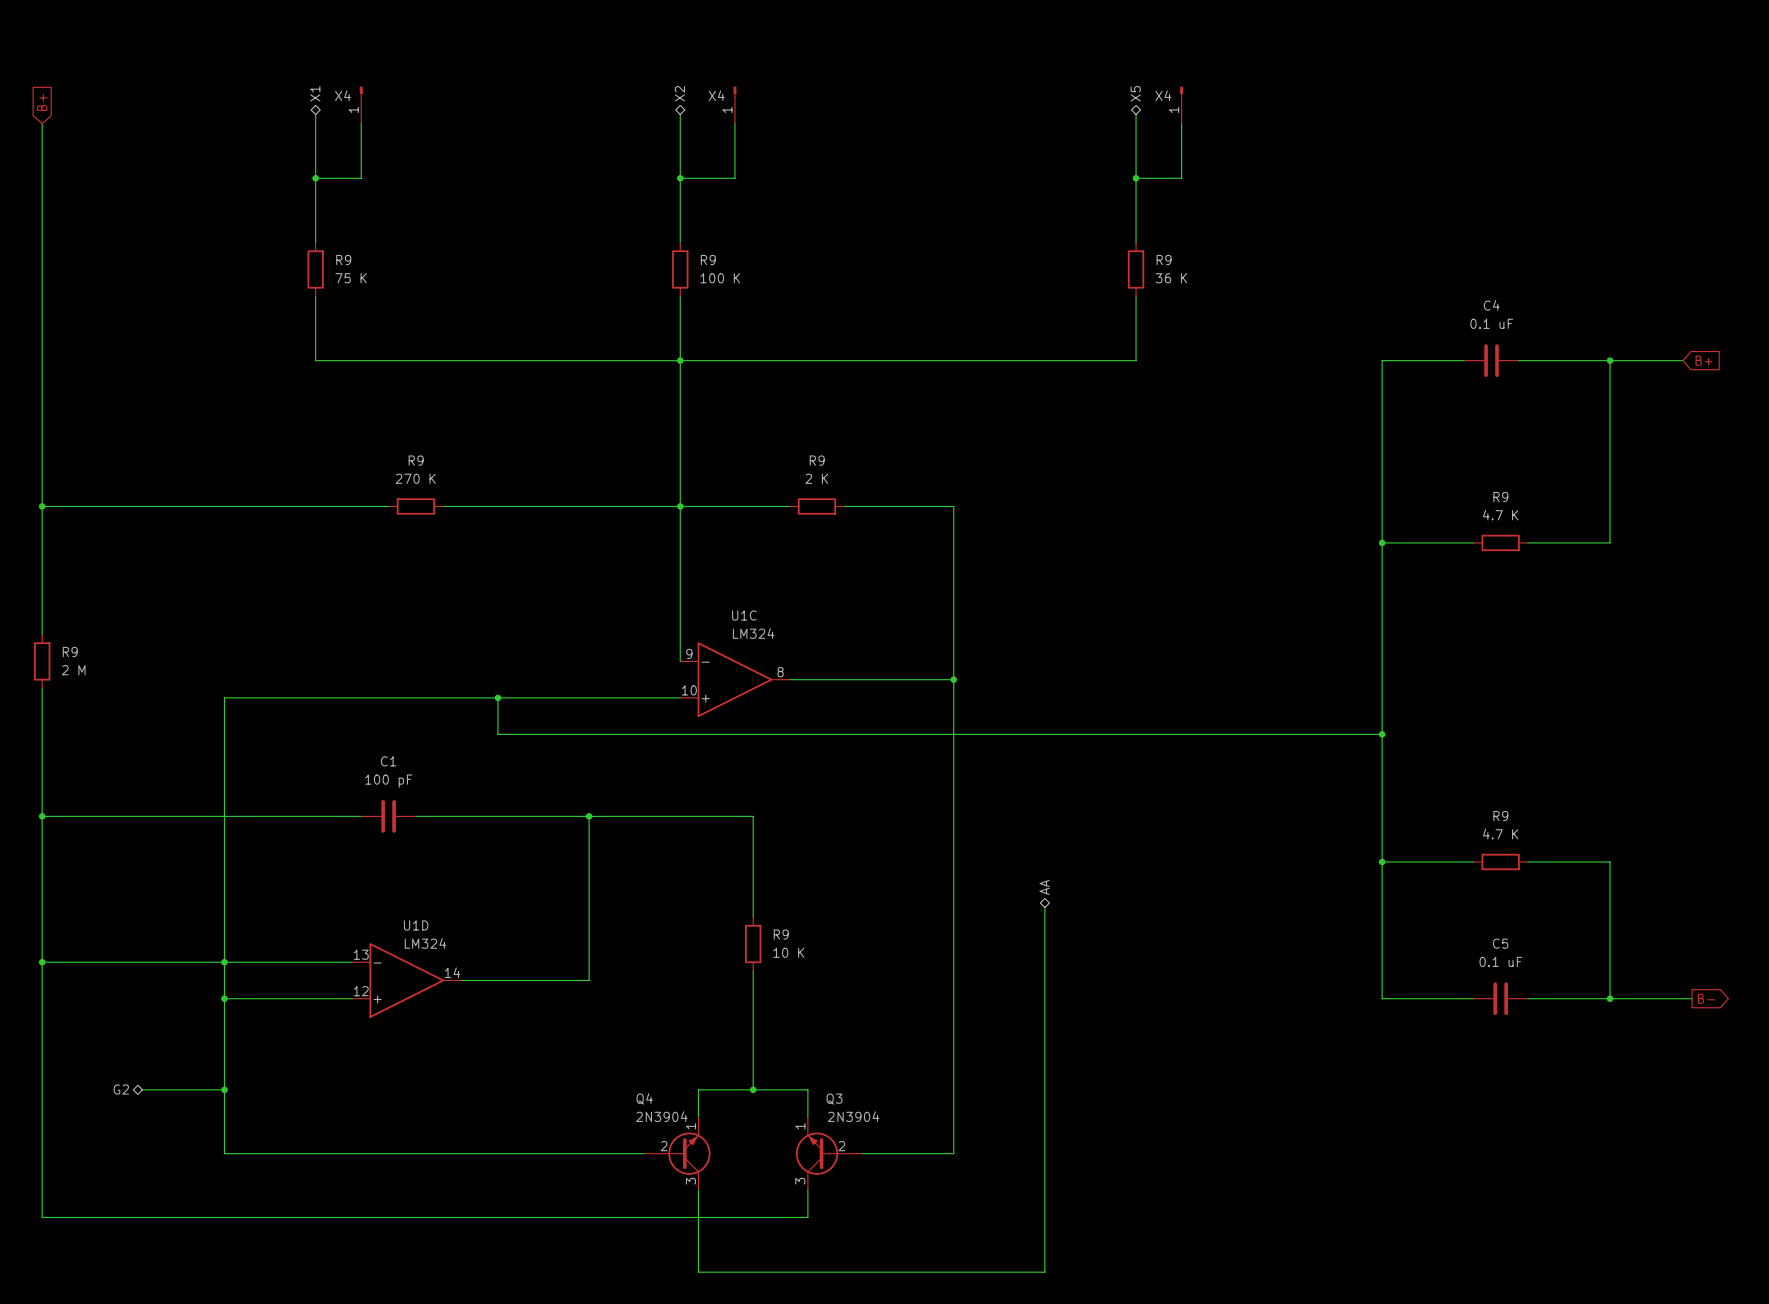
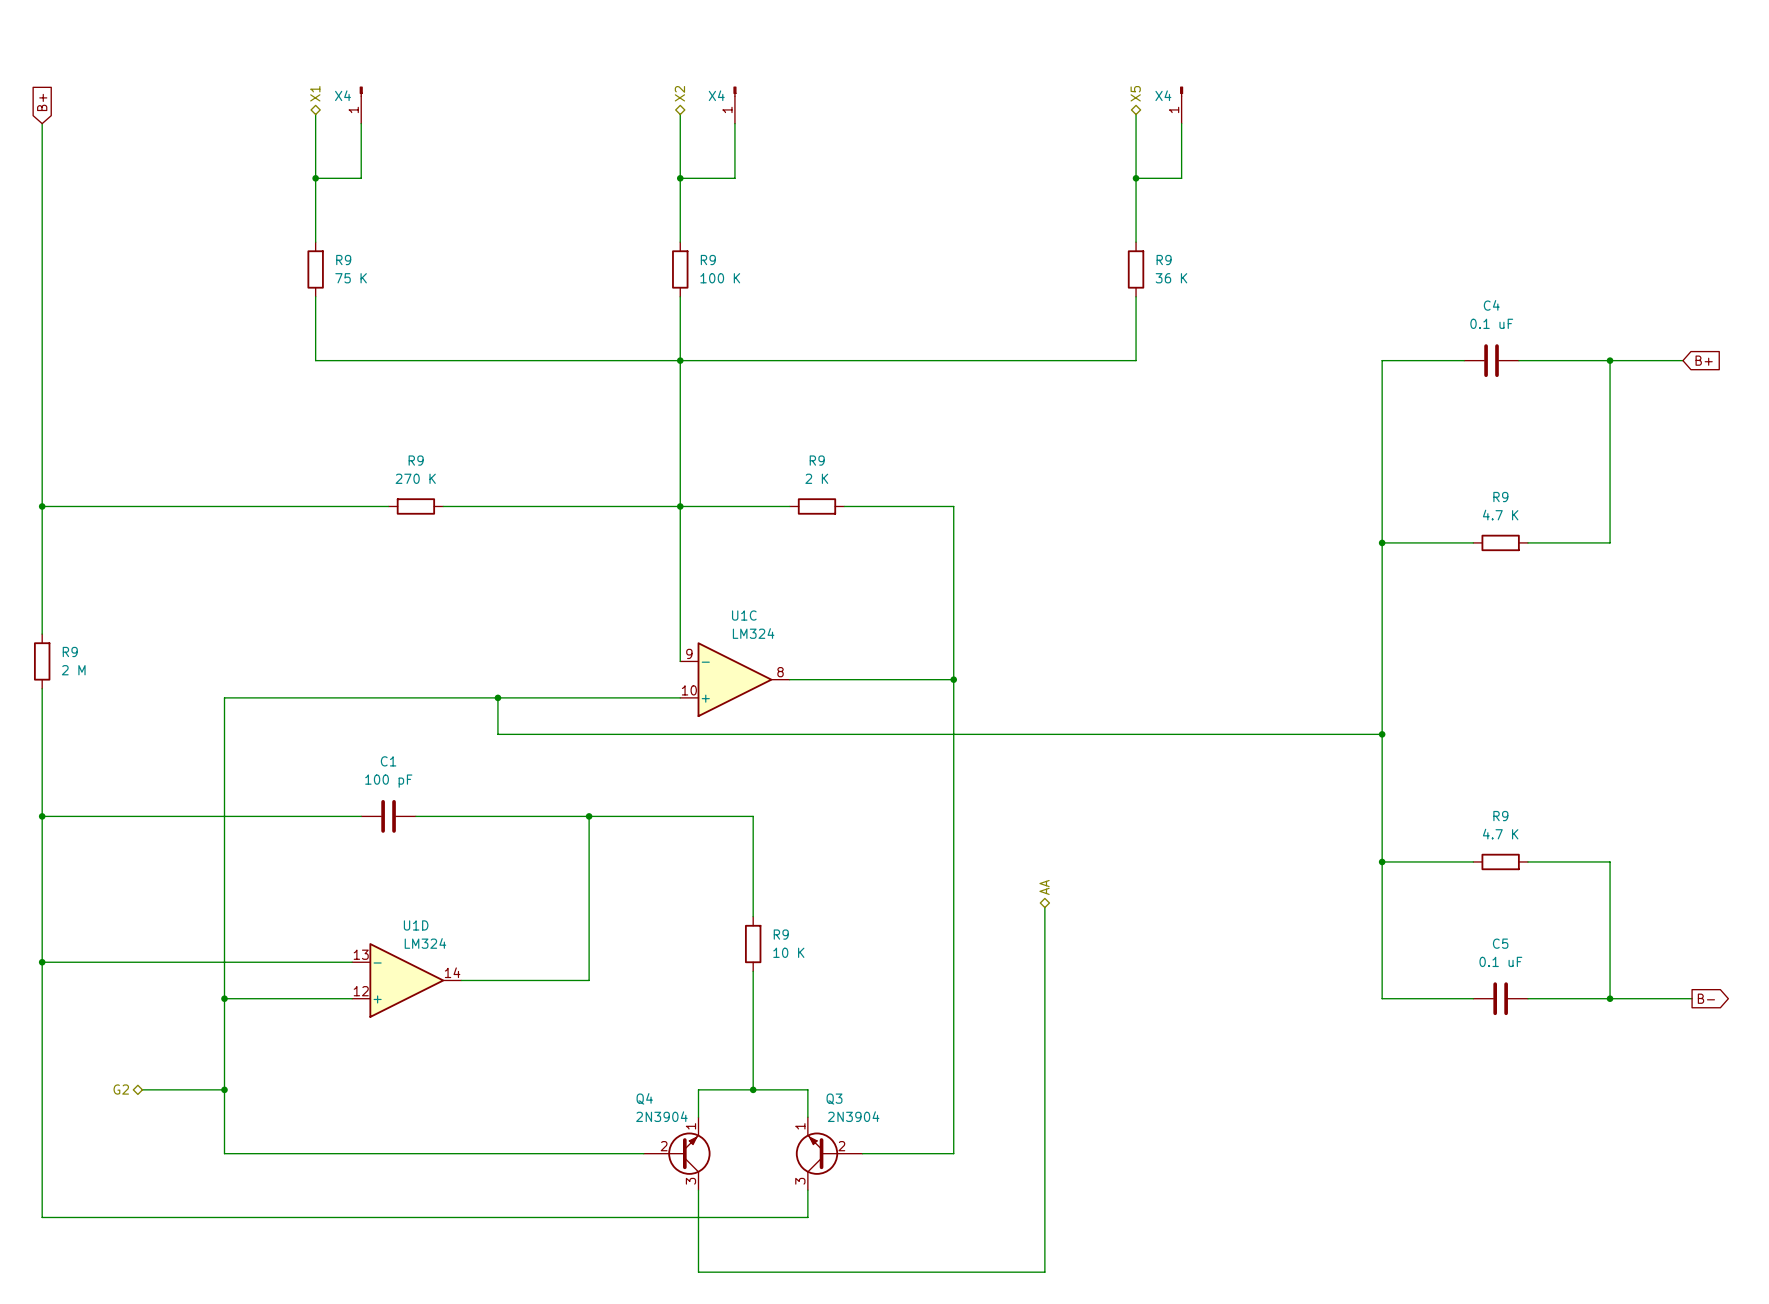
junction: (224, 962) -> none

